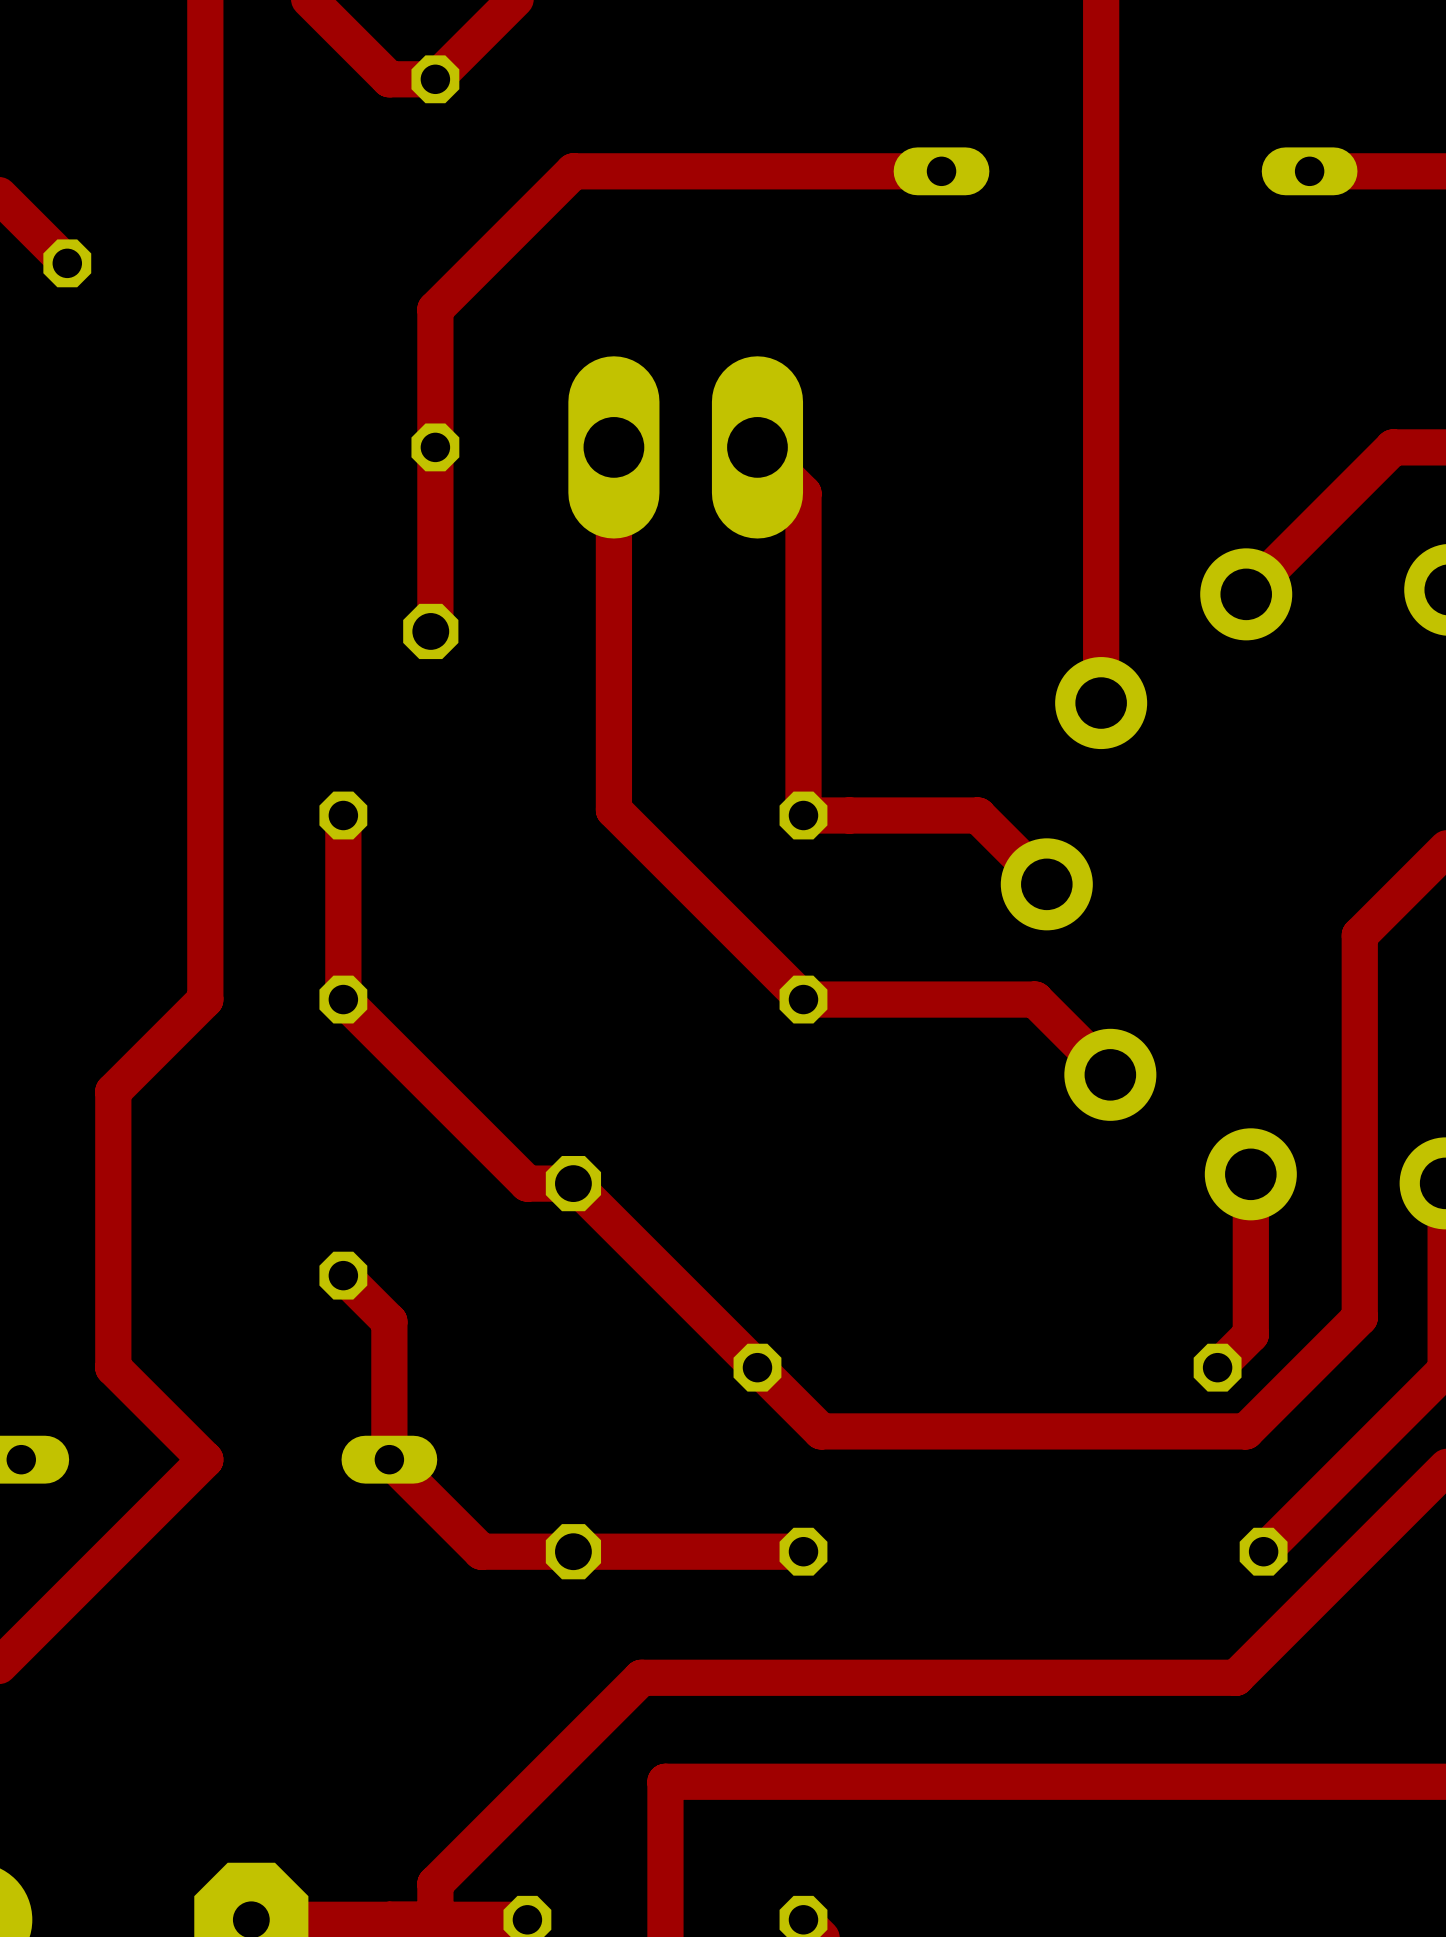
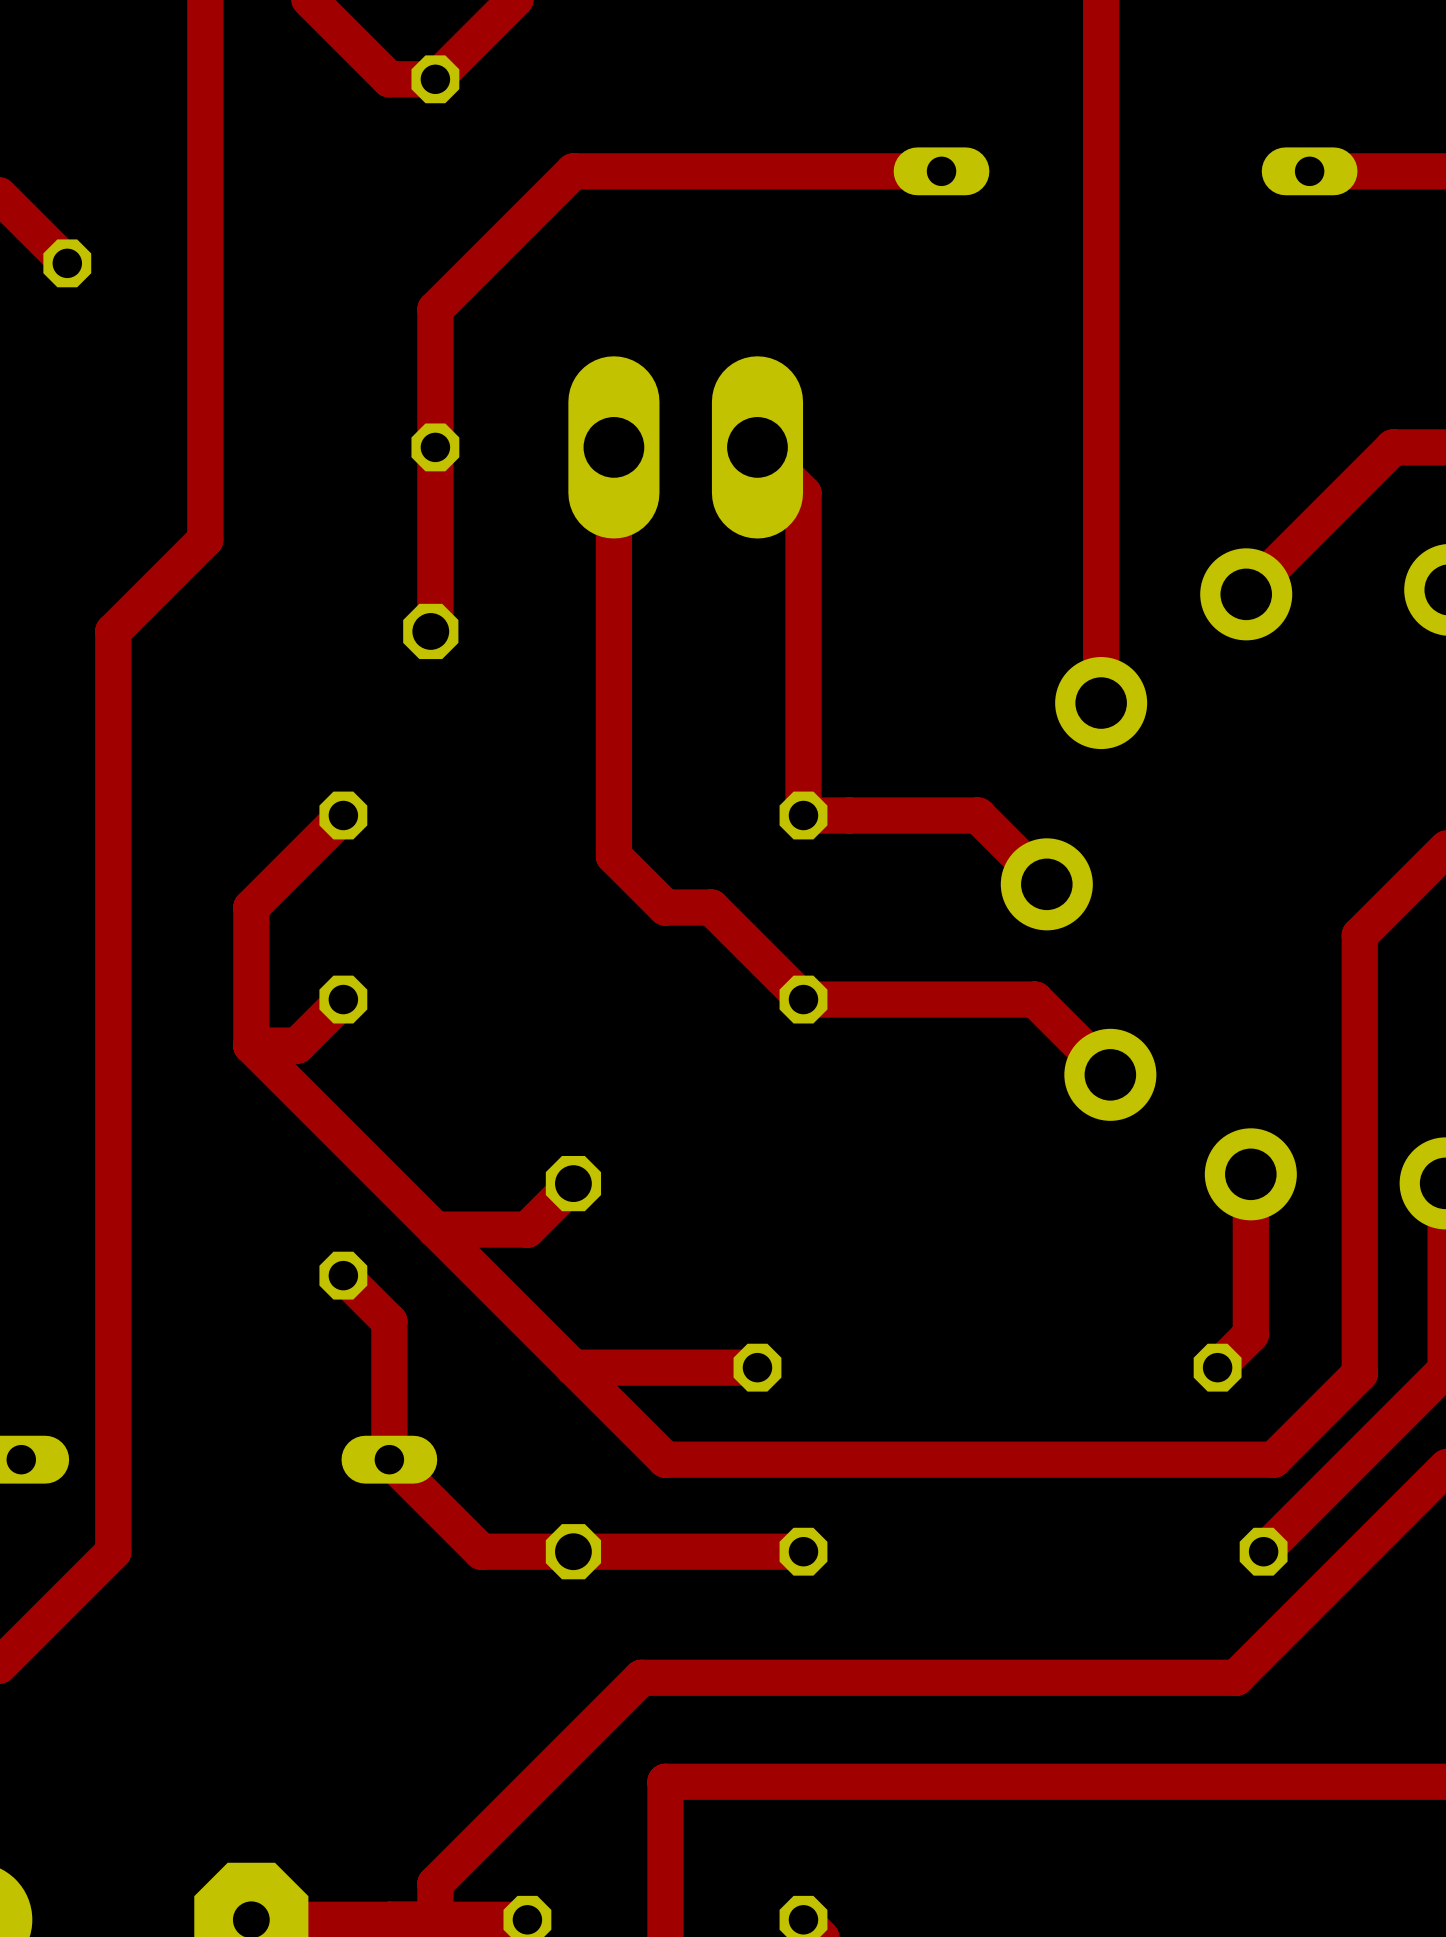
top track: (205, 539) (205, 999) (113, 1091) -> (205, 539) (113, 631) (113, 1091)
top track: (613, 809) (711, 907) -> (613, 809) (613, 855) (665, 907) (711, 907)
top track: (343, 815) (343, 999) (527, 1183) (573, 1183) (821, 1431) (1245, 1431) (1359, 1317) -> (251, 1045) (665, 1459) (1273, 1459) (1359, 1373) (1359, 1317)
top track: none -> (343, 815) (251, 907) (251, 1045)
top track: none -> (343, 999) (297, 1045) (251, 1045)
top track: none -> (573, 1183) (527, 1229) (435, 1229)
top track: (113, 1367) (205, 1459) (113, 1551) -> (113, 1367) (113, 1551)
top track: none -> (757, 1367) (573, 1367)

